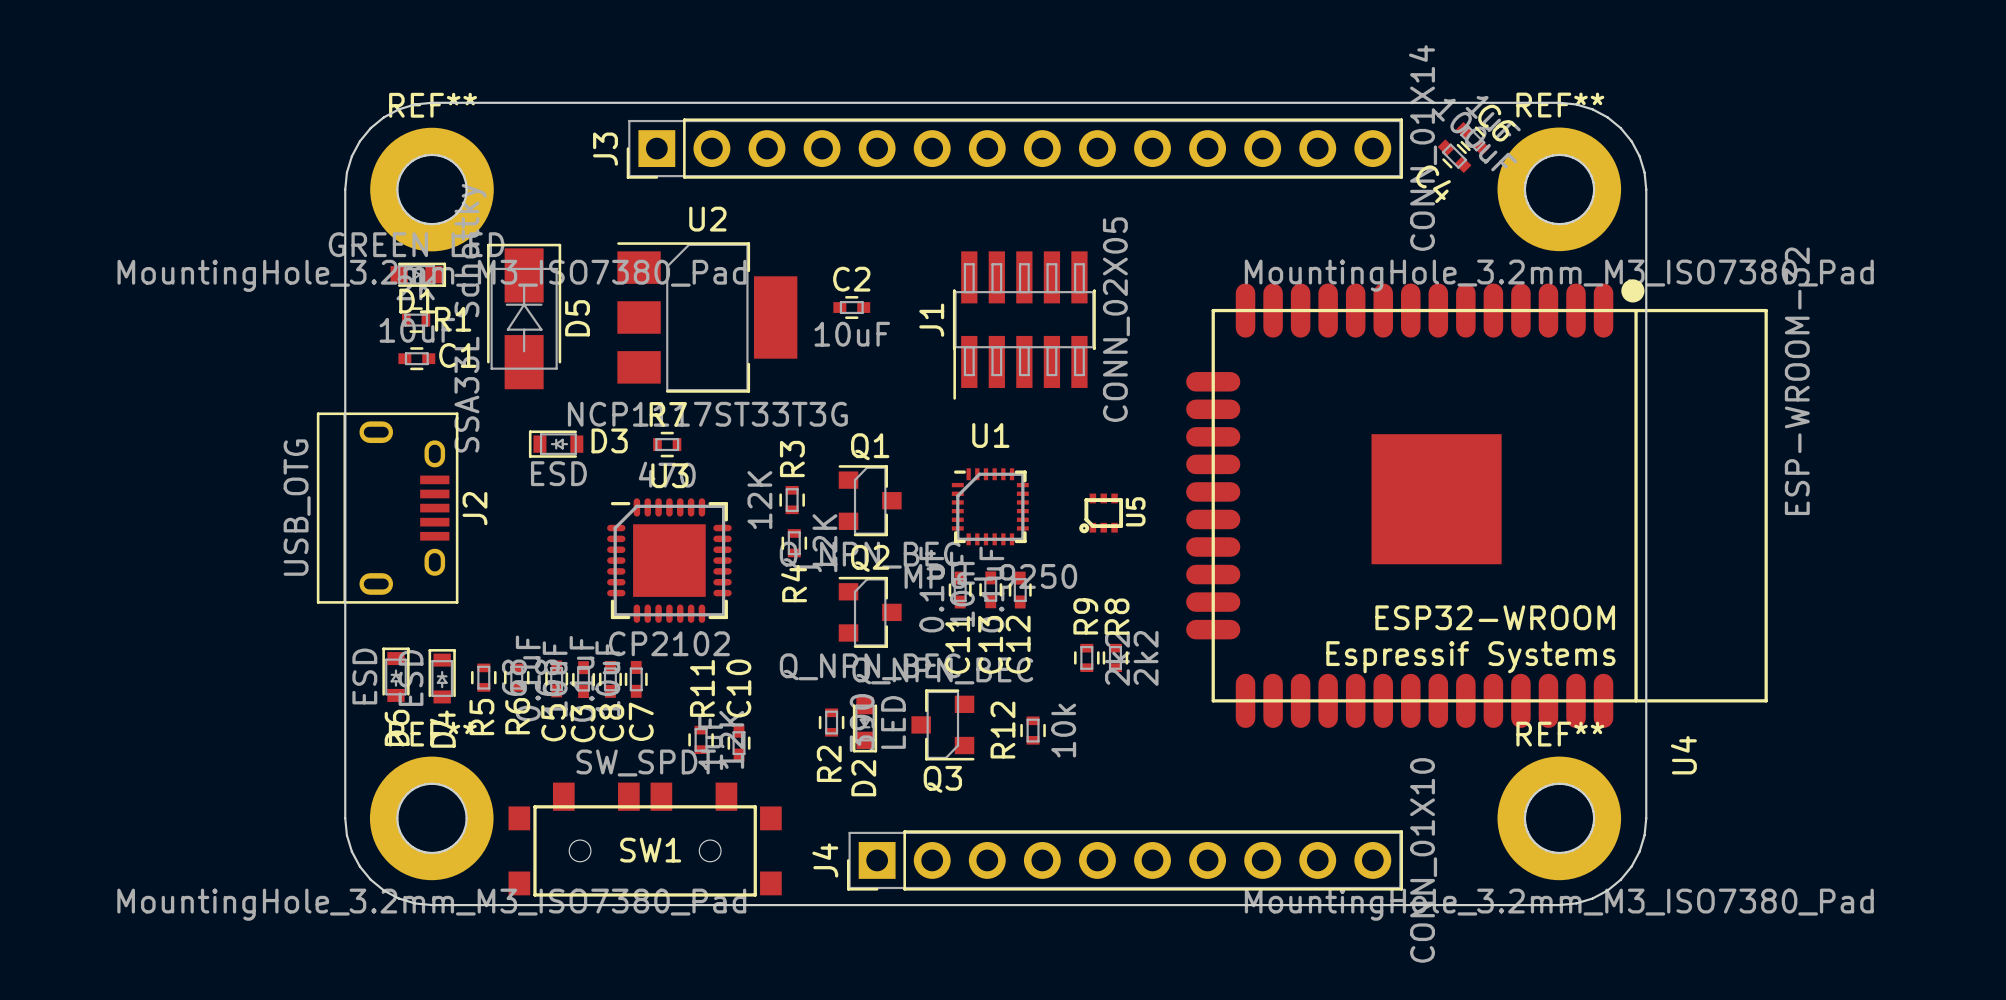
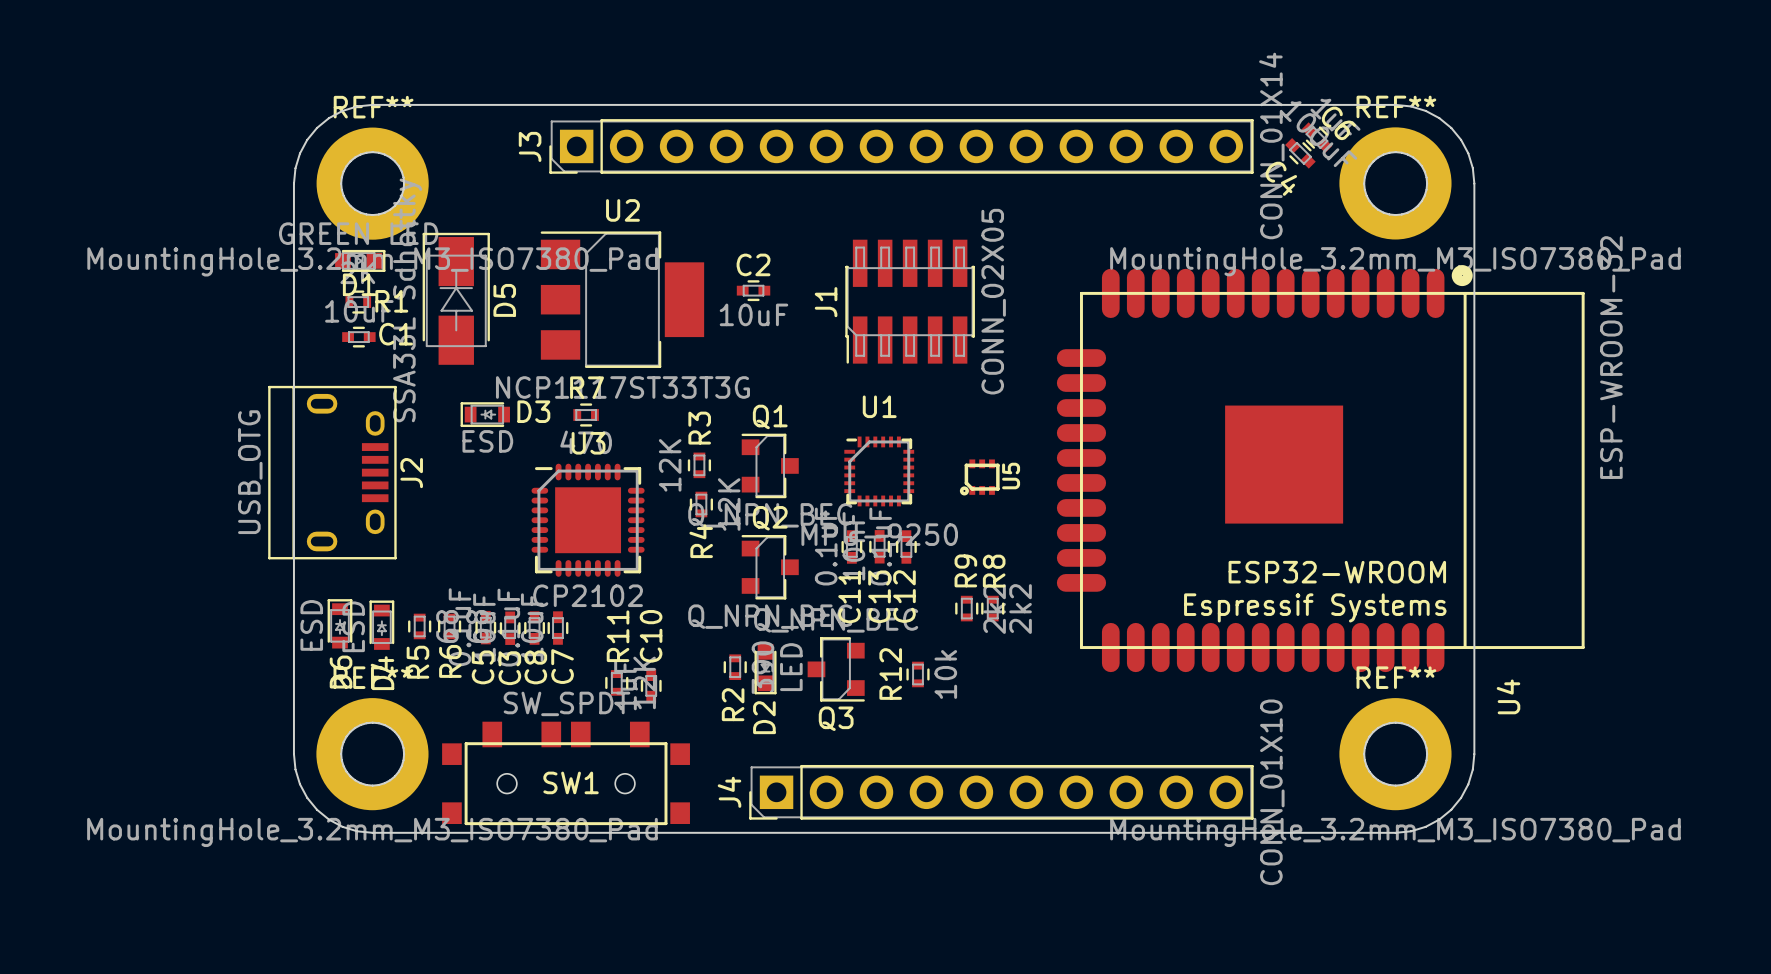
J3 footprint: [626, 118, 1403, 179] -> [549, 119, 1254, 174]
J1 footprint: [952, 251, 1096, 400] -> [845, 239, 975, 364]
J4 footprint: [847, 830, 1403, 891] -> [749, 764, 1254, 820]

